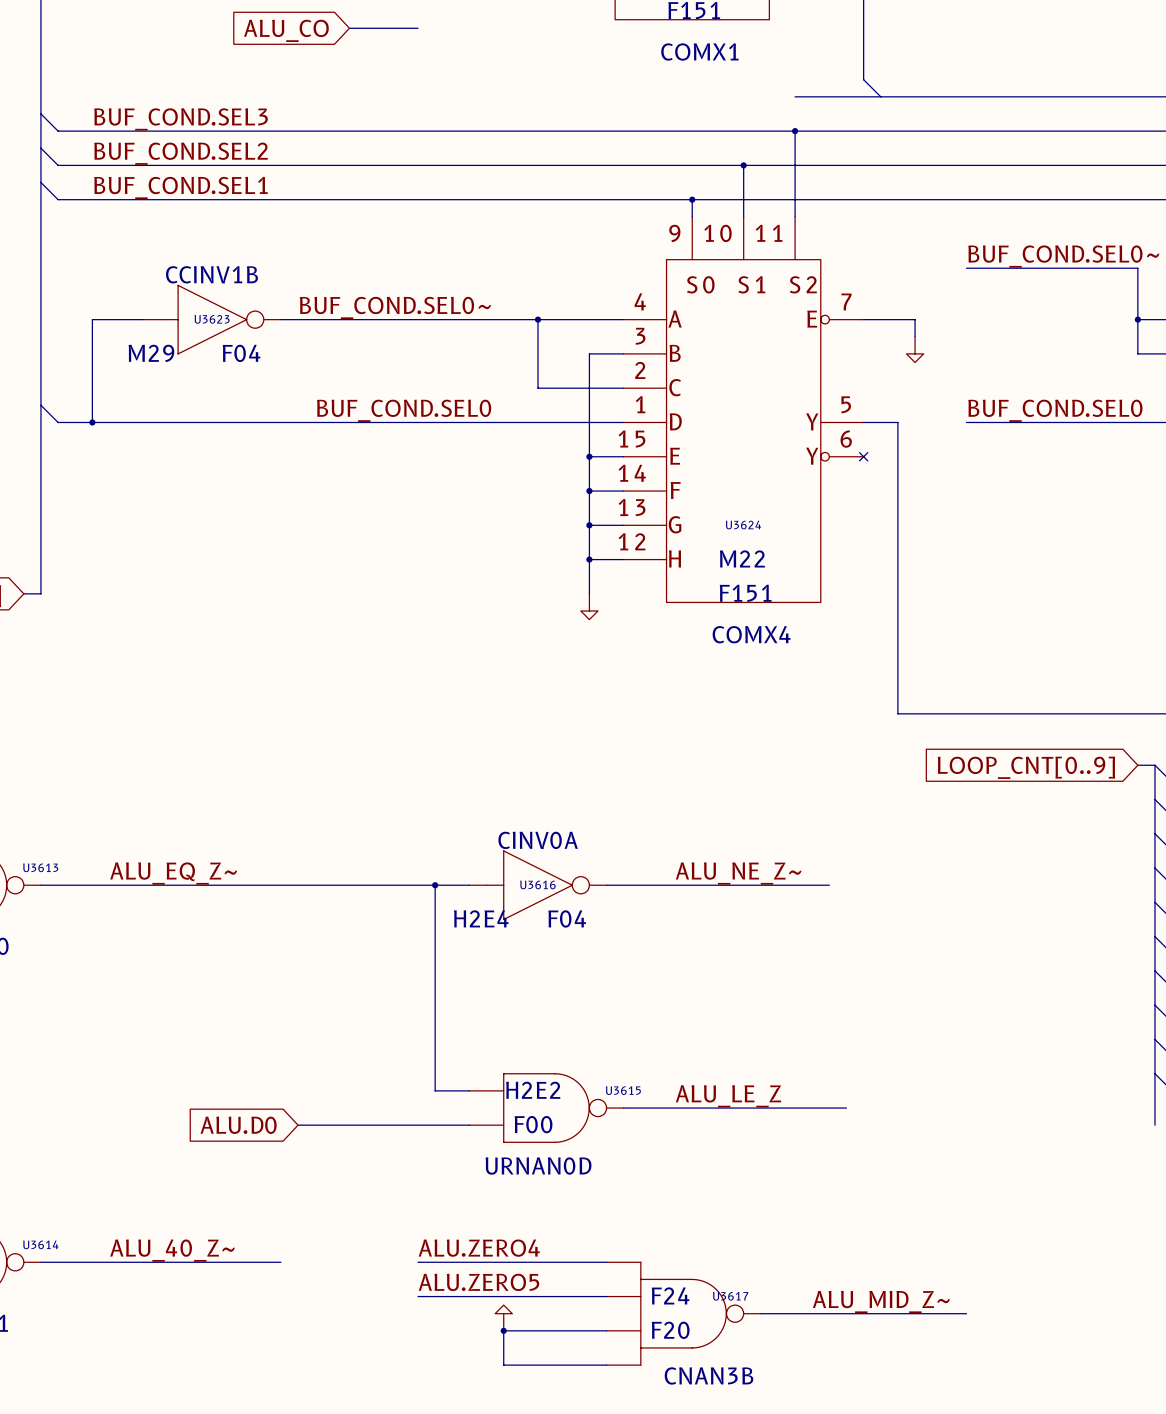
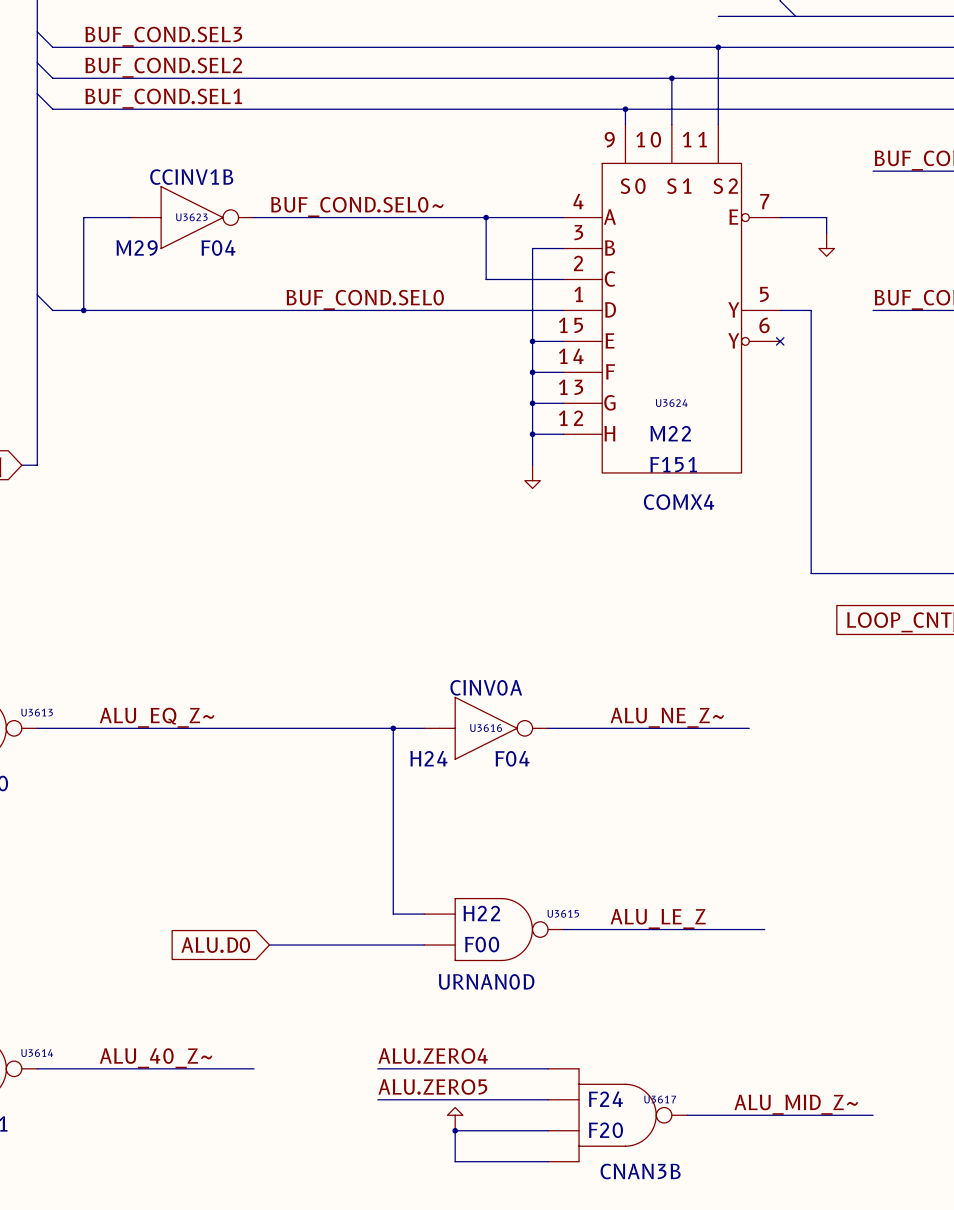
U3616 text: H2E4 (481, 918) -> H24 (428, 758)
U3615 text: H2E2 (533, 1090) -> H22 (481, 913)

